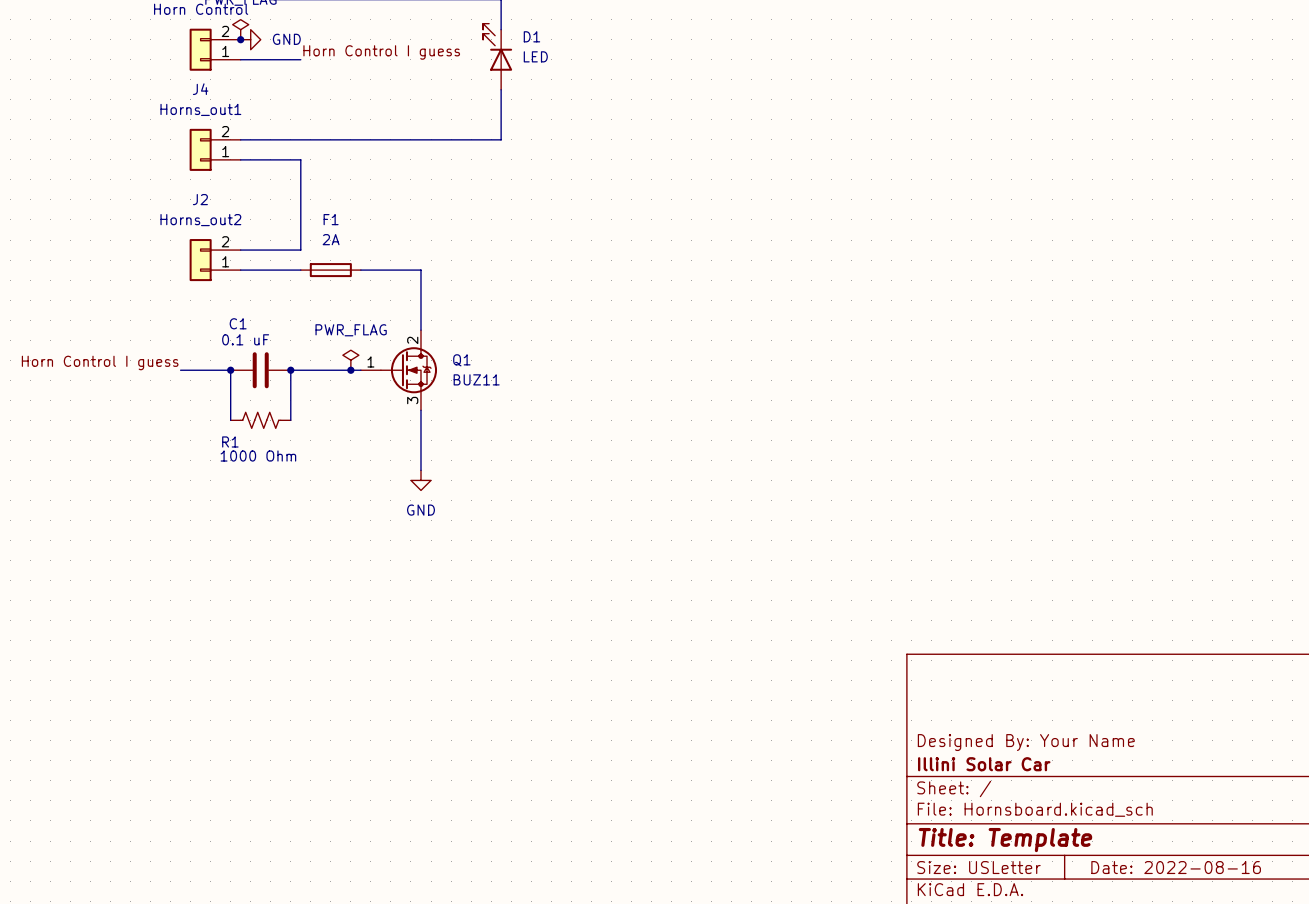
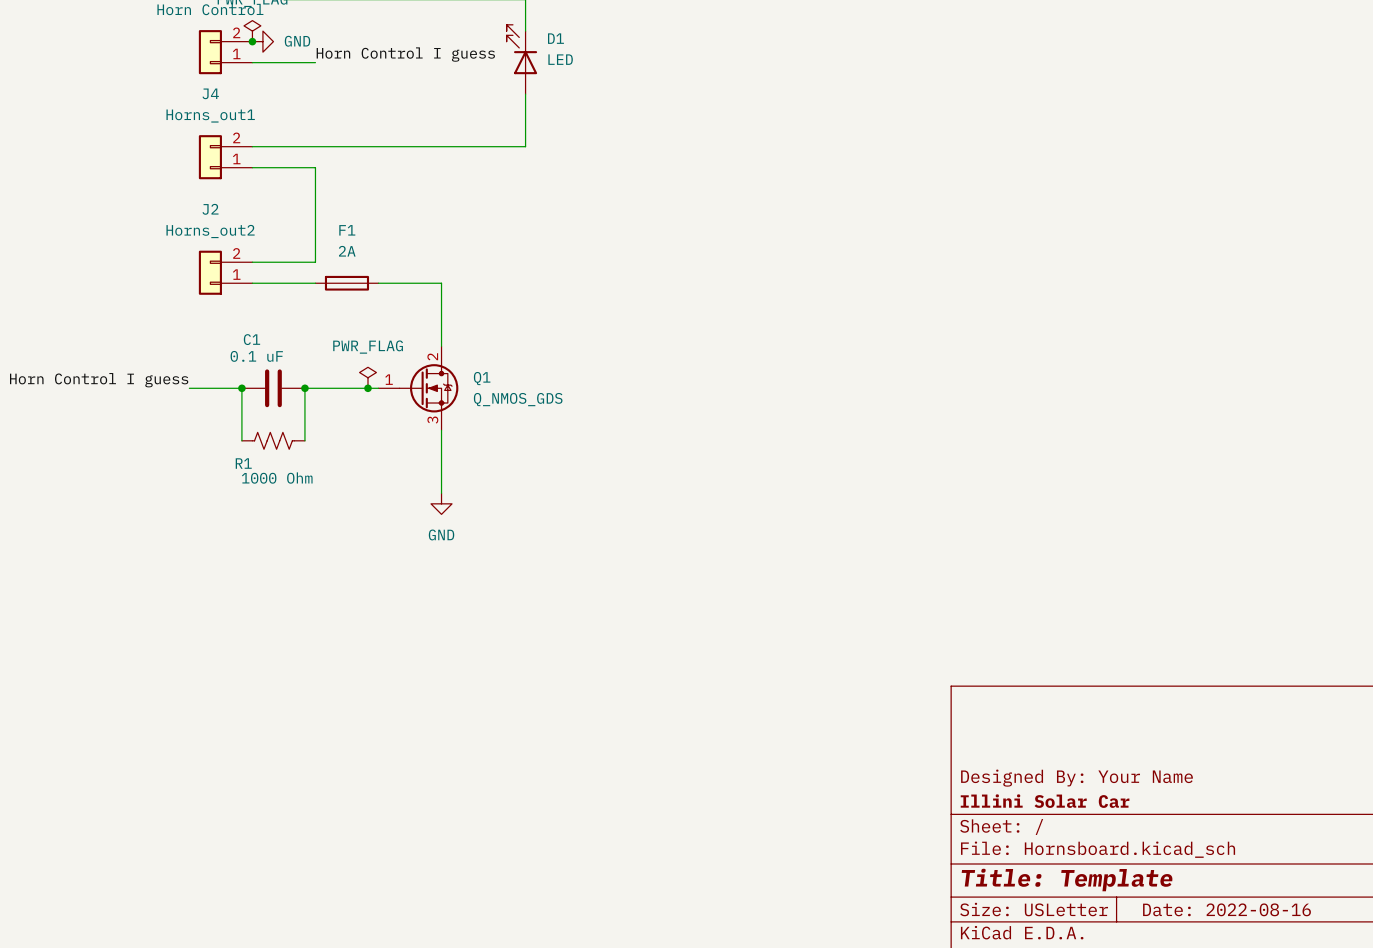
Q1 value: BUZ11 (476, 379) -> Q_NMOS_GDS (518, 399)

